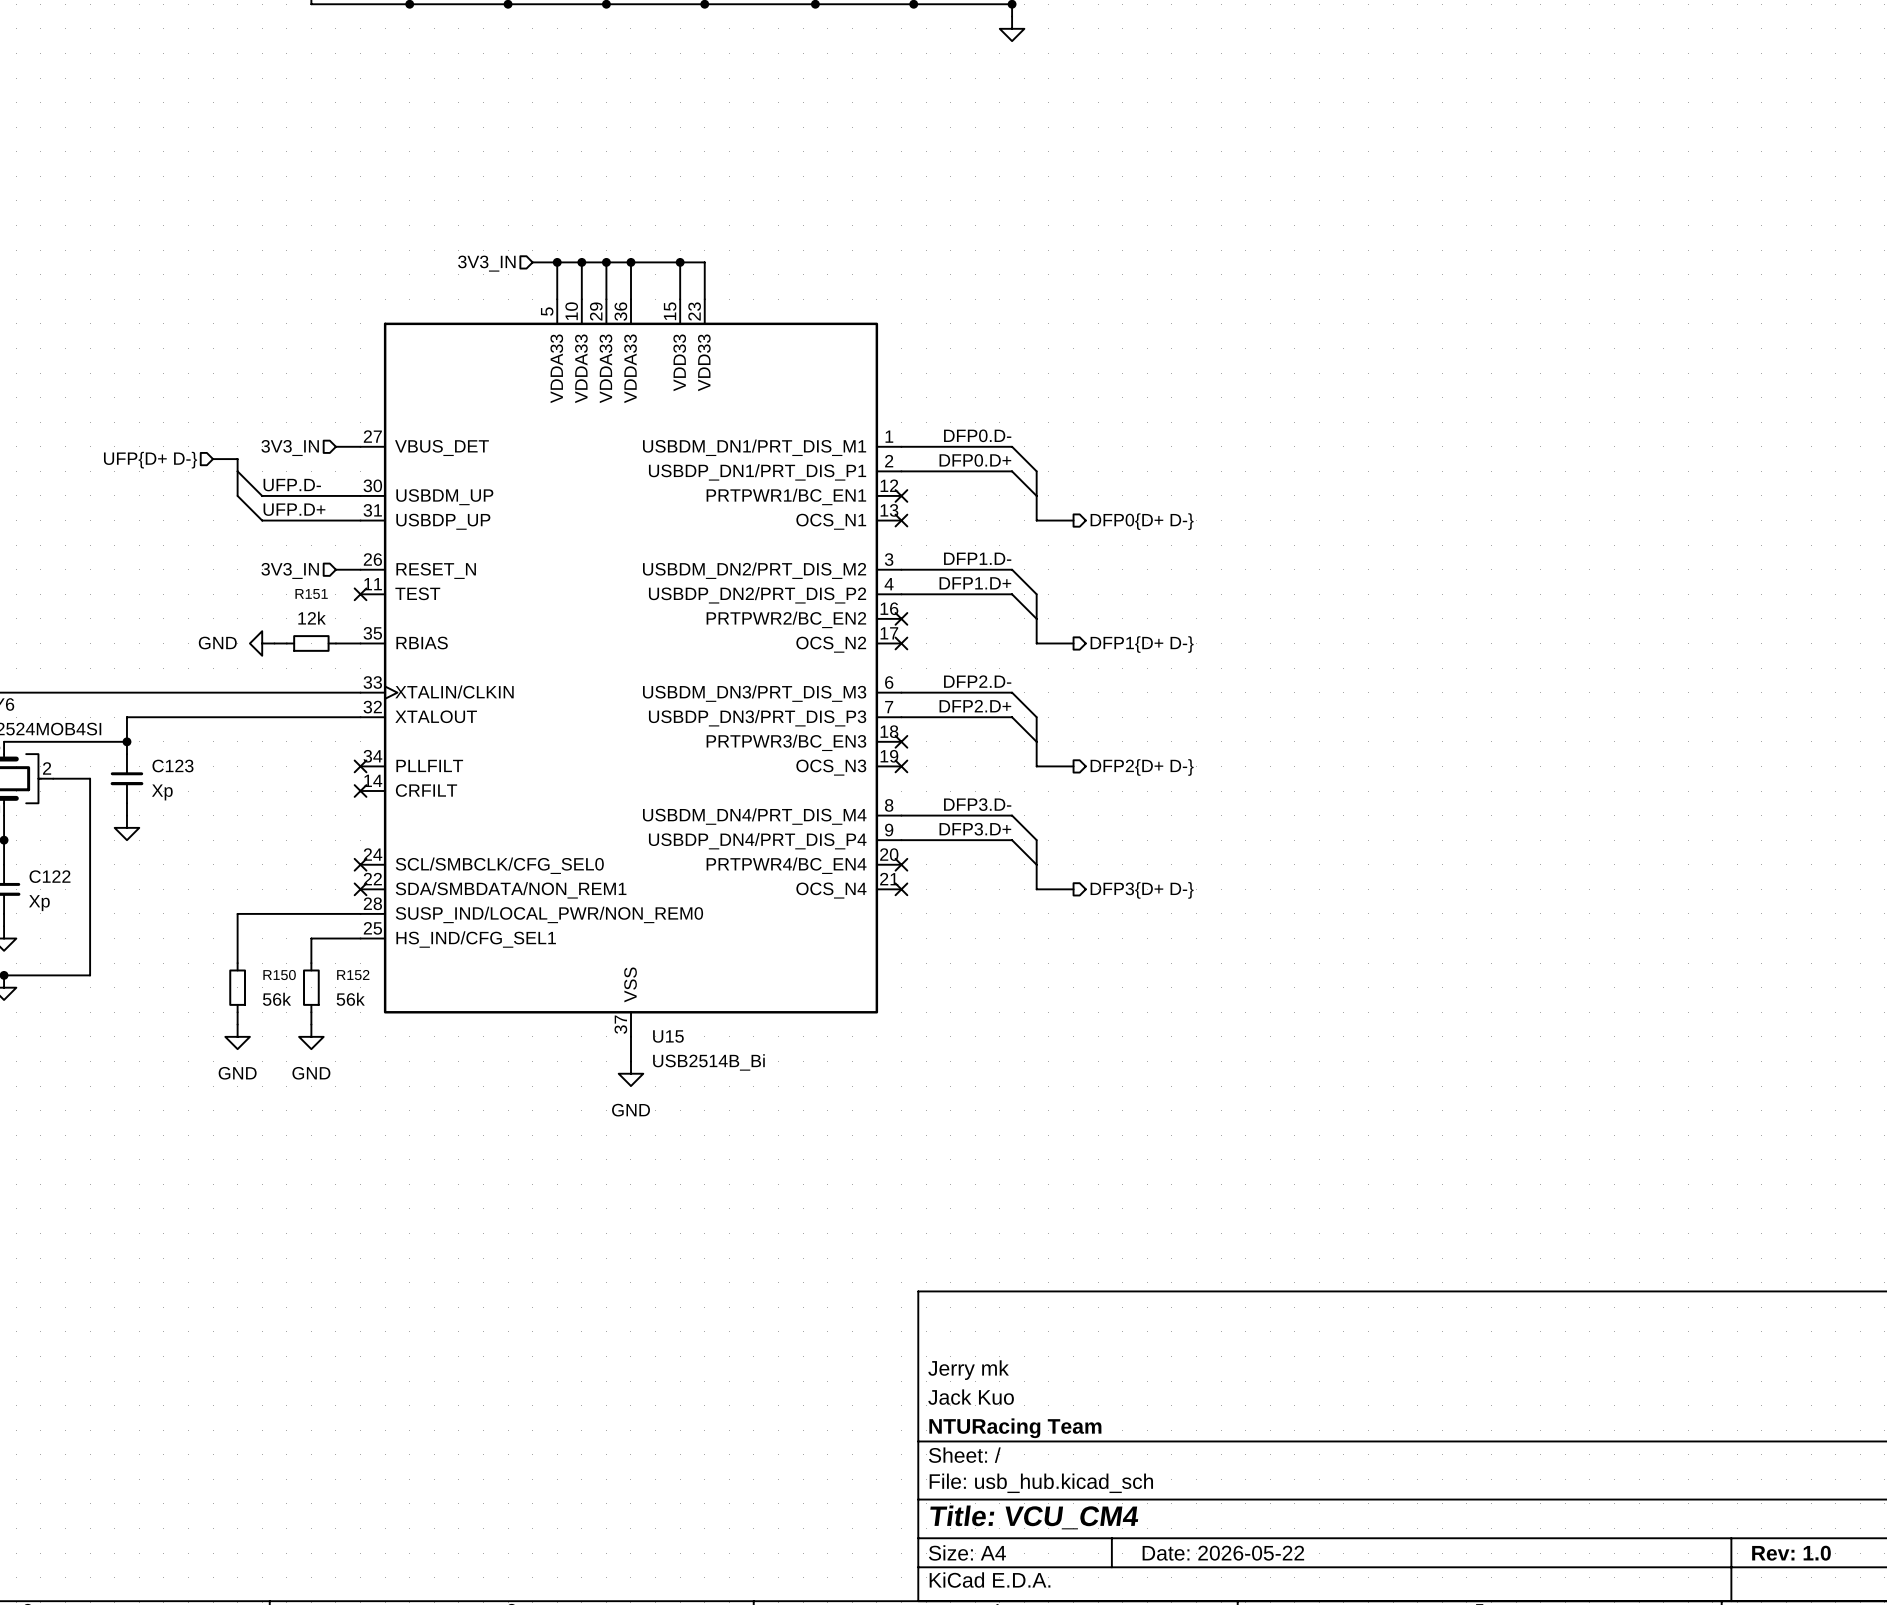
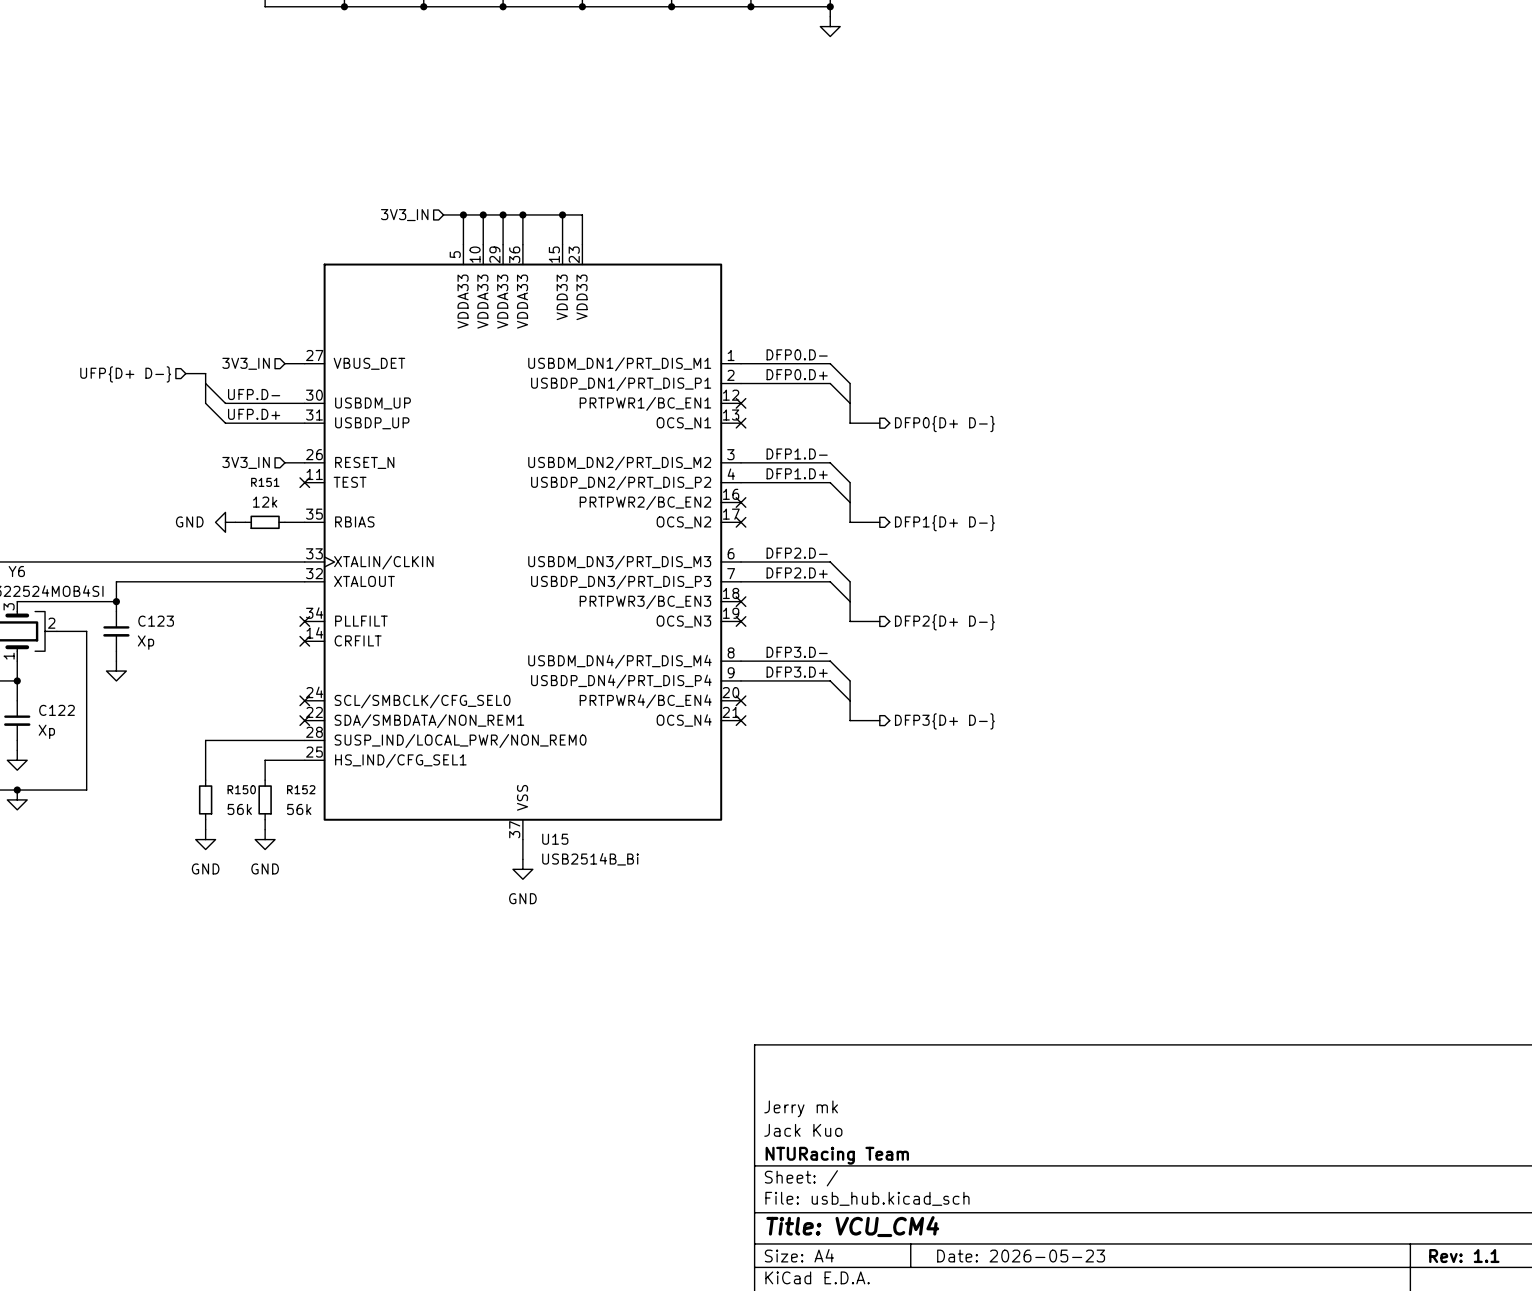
title block: Date: 2026-05-22 (1223, 1553) -> Date: 2026-05-23 (1021, 1256)
title block: Rev: 1.0 (1791, 1553) -> Rev: 1.1 (1464, 1256)

